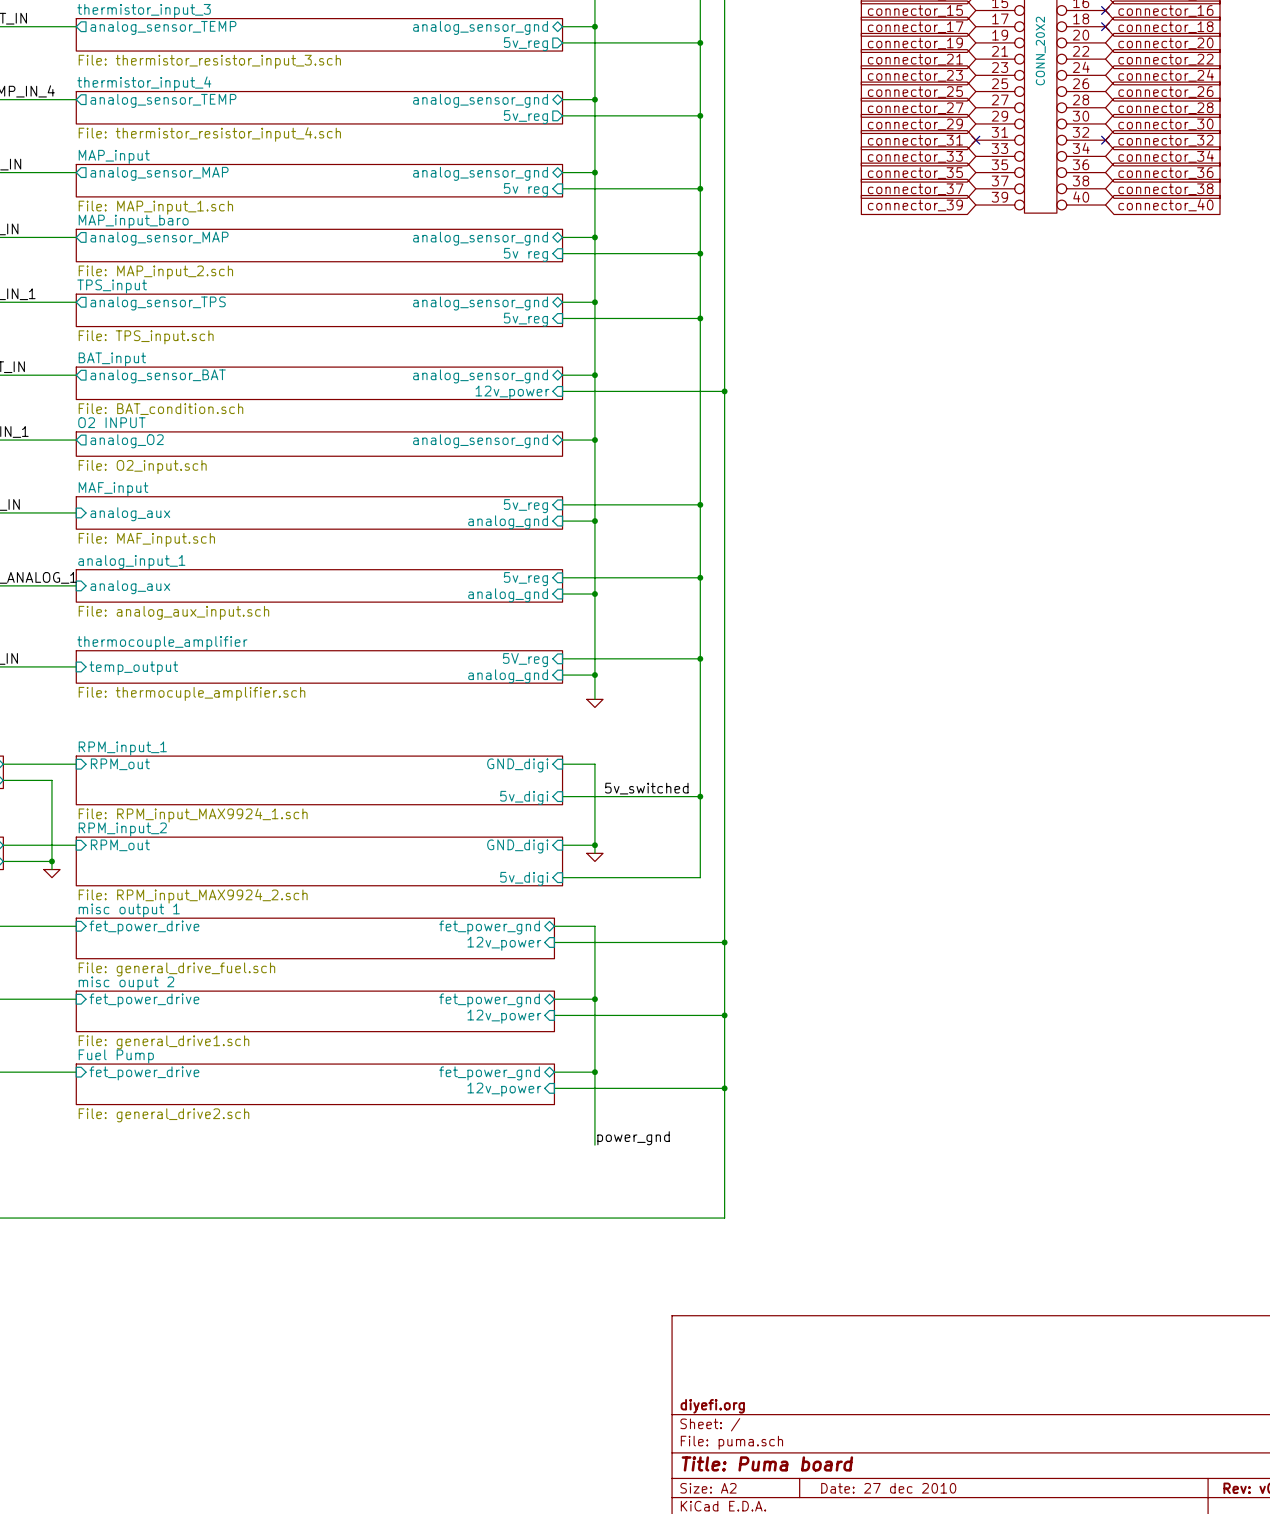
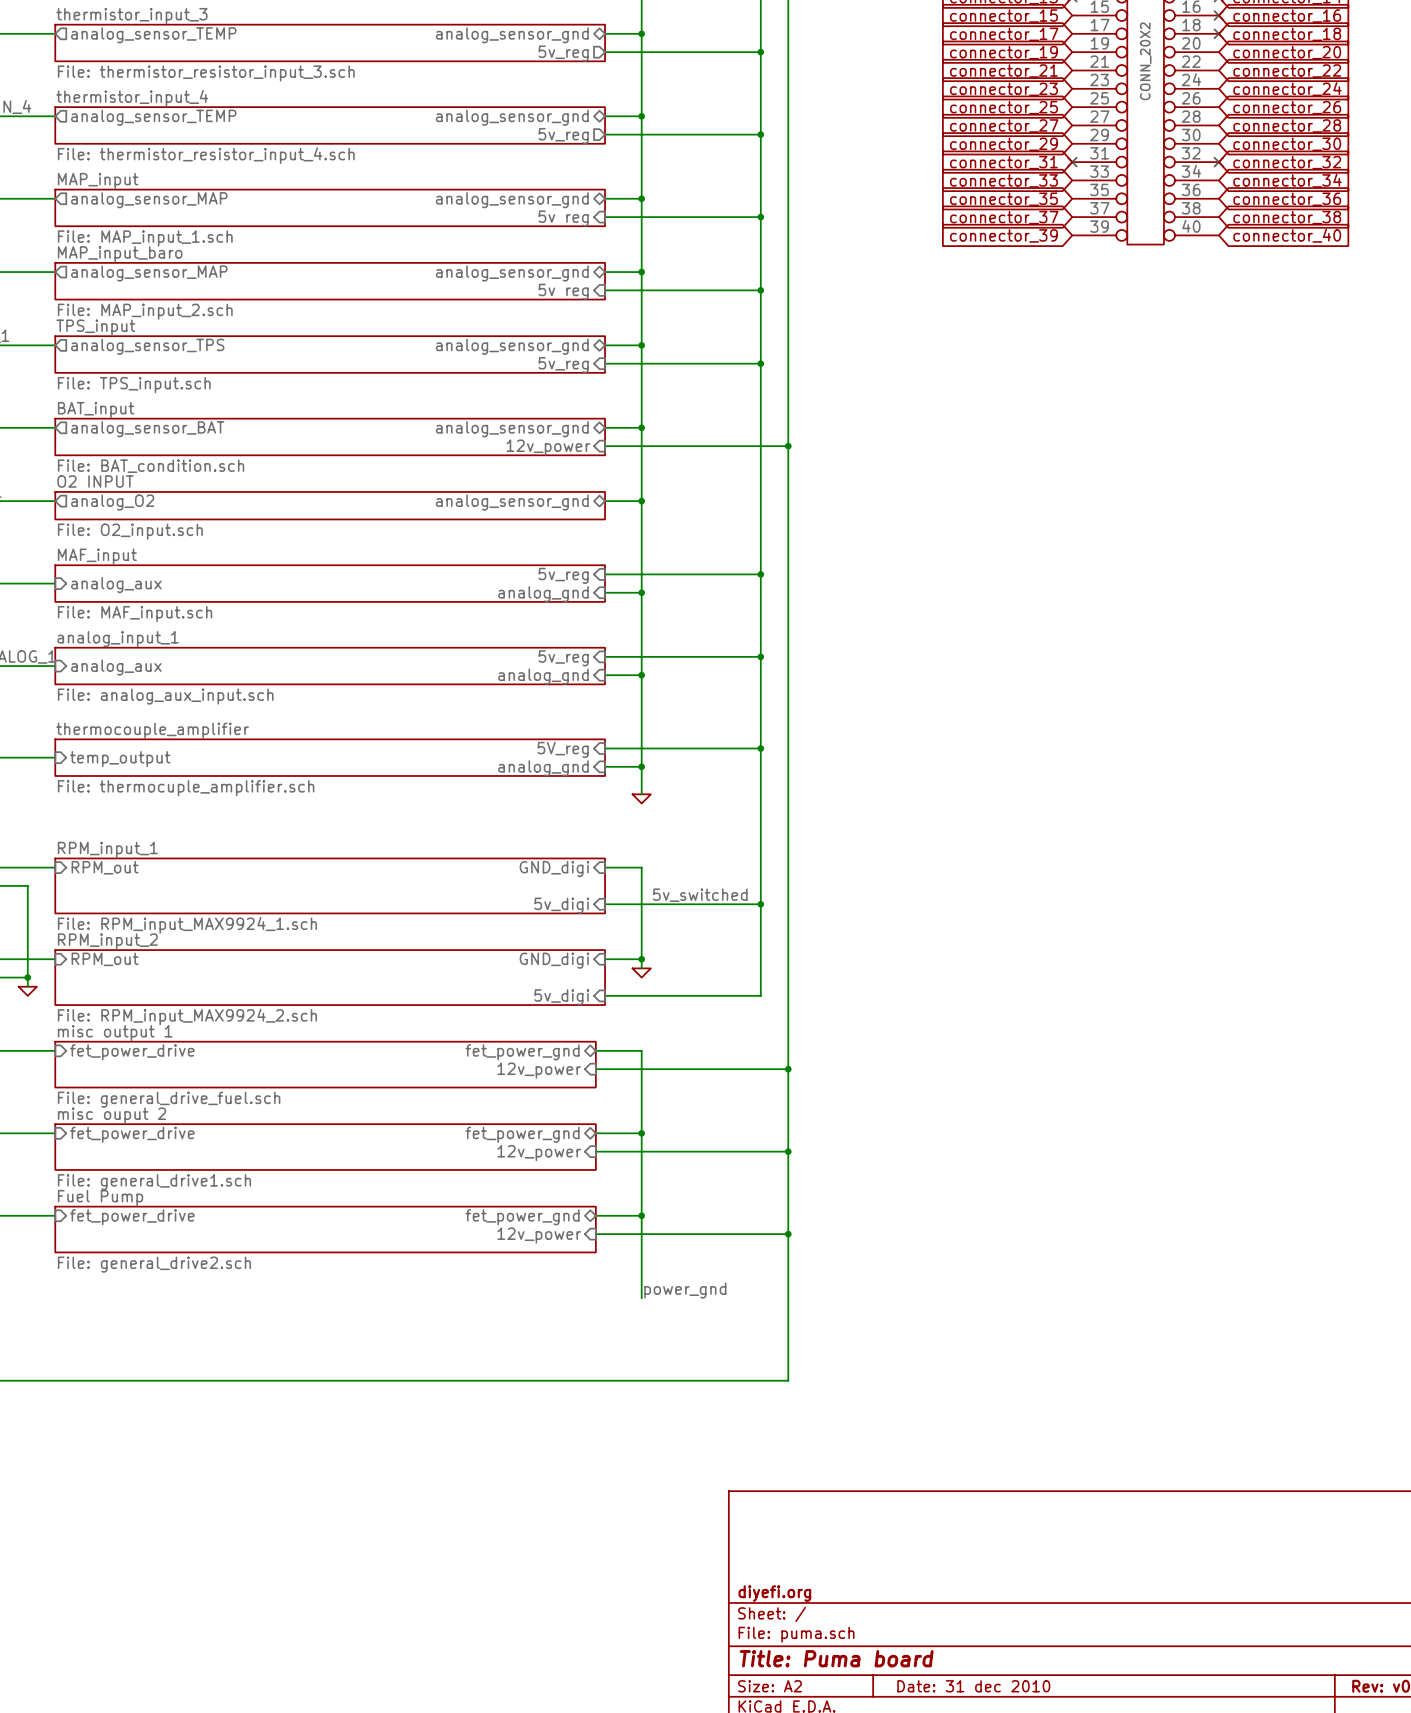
title block: Date: 27 dec 2010 (888, 1488) -> Date: 31 dec 2010 (973, 1686)

